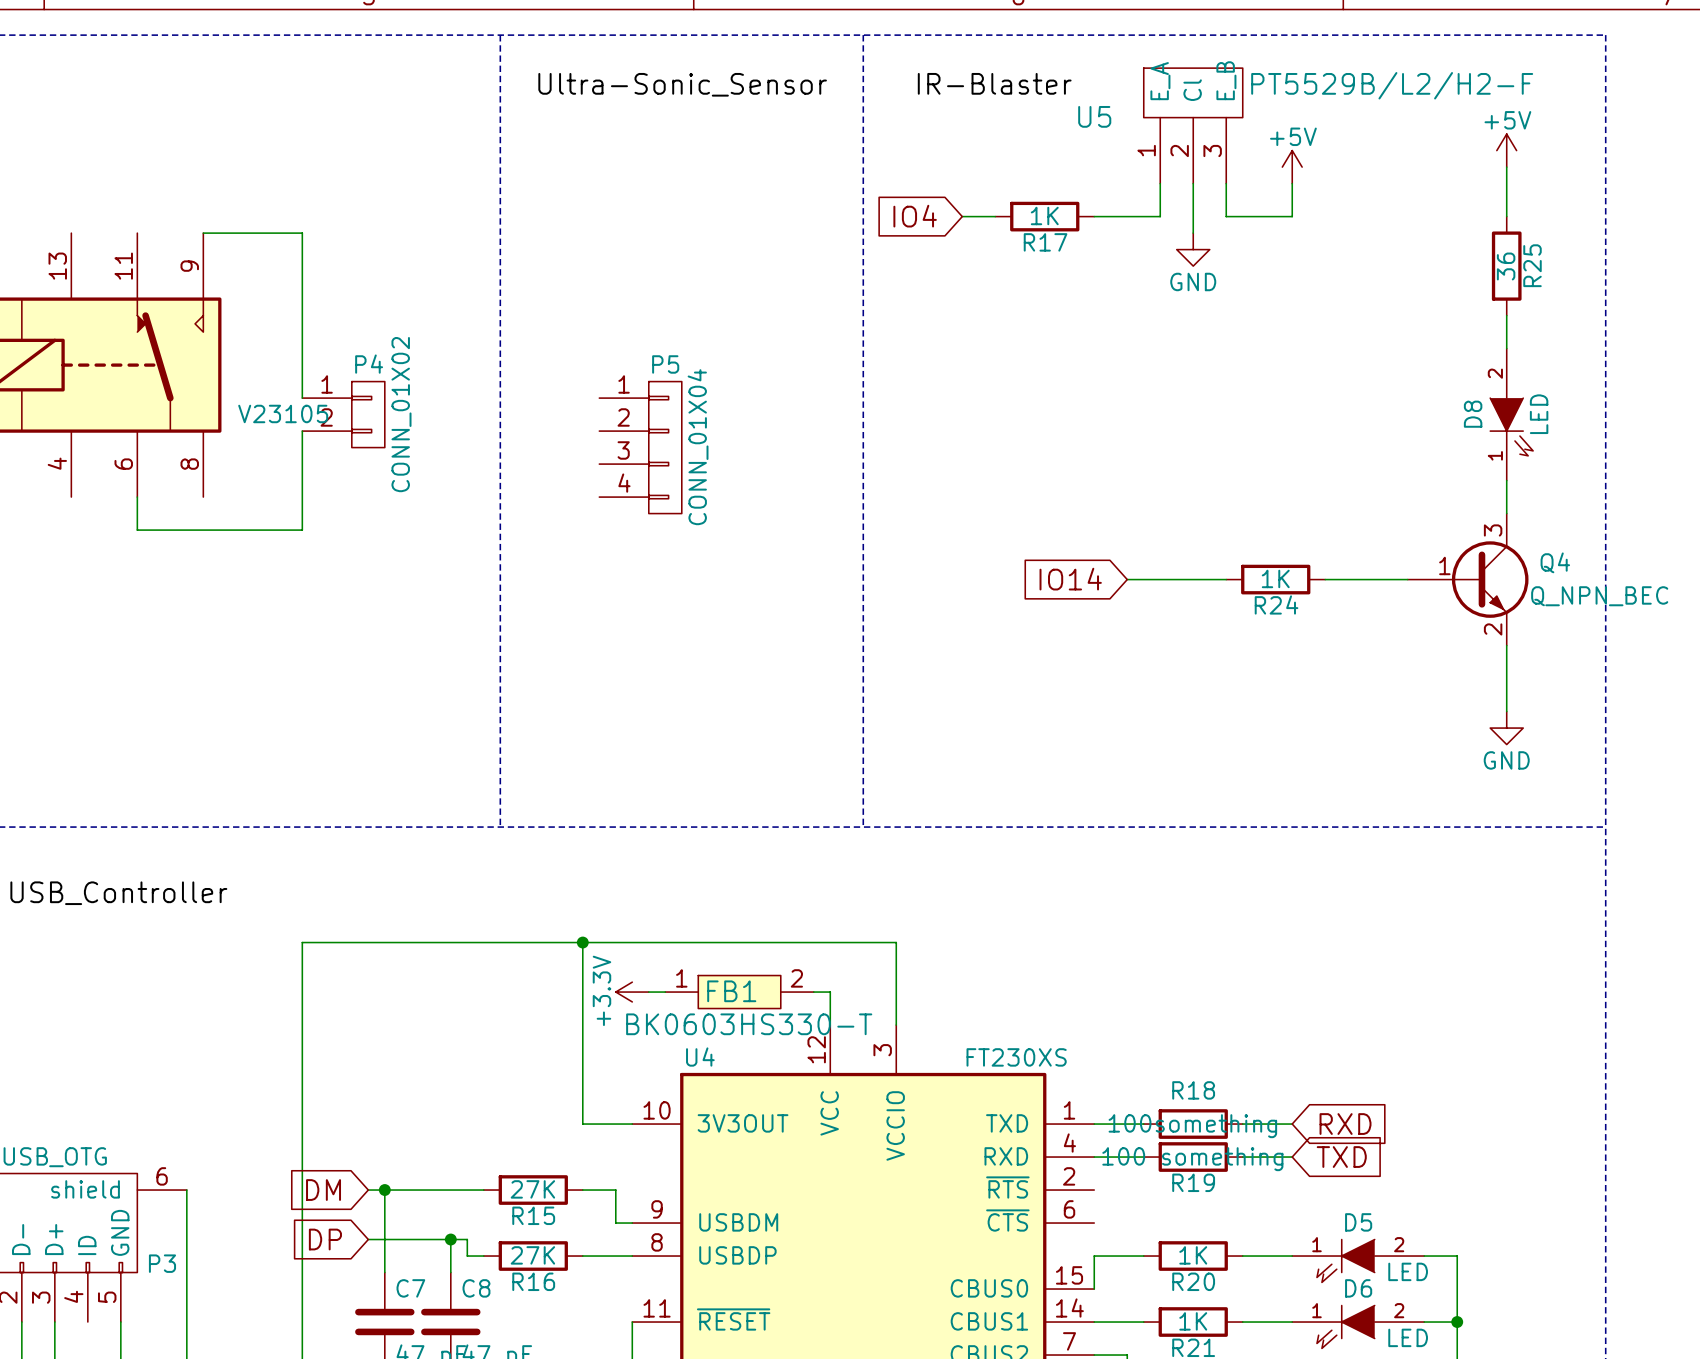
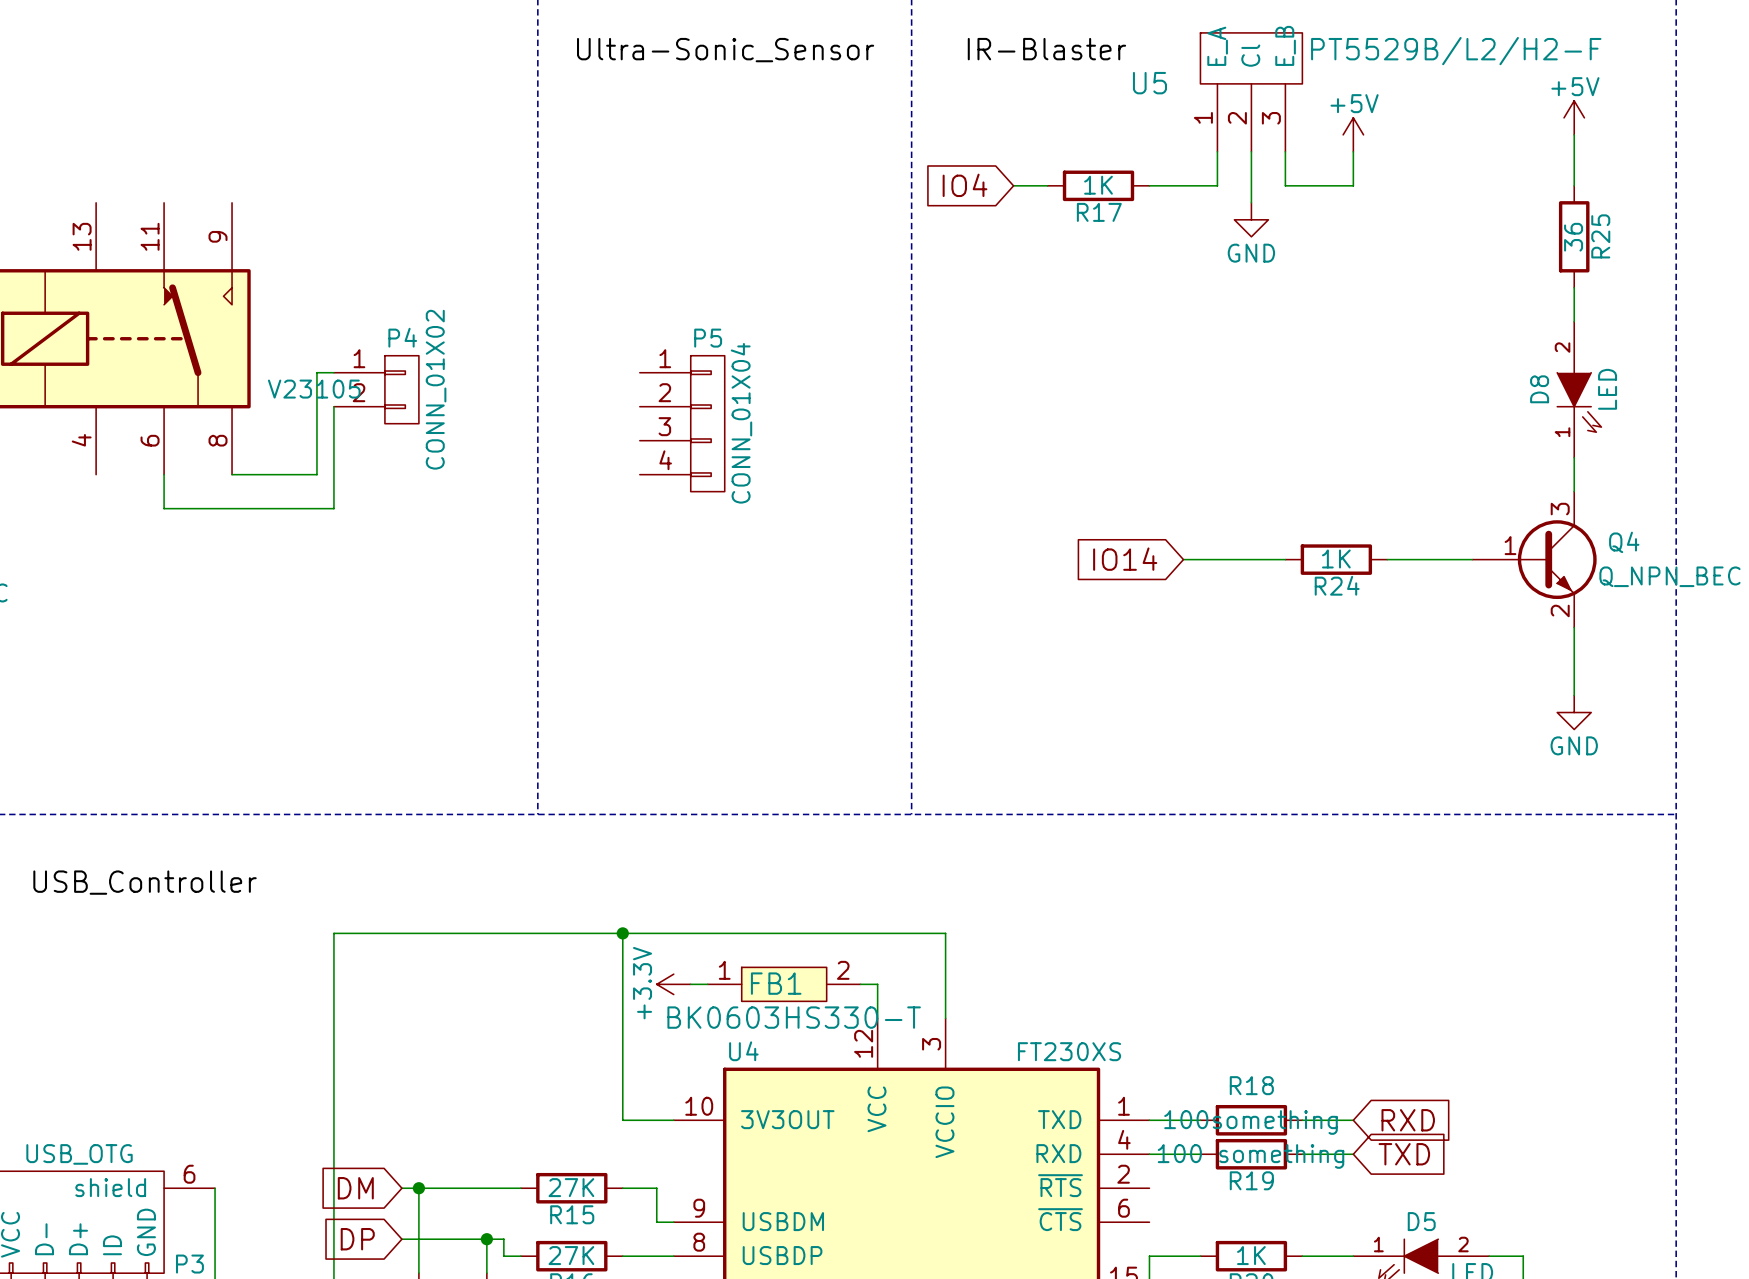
wire: (203, 233) (302, 233) (302, 398) -> (232, 474) (316, 474) (316, 372) (333, 372)

